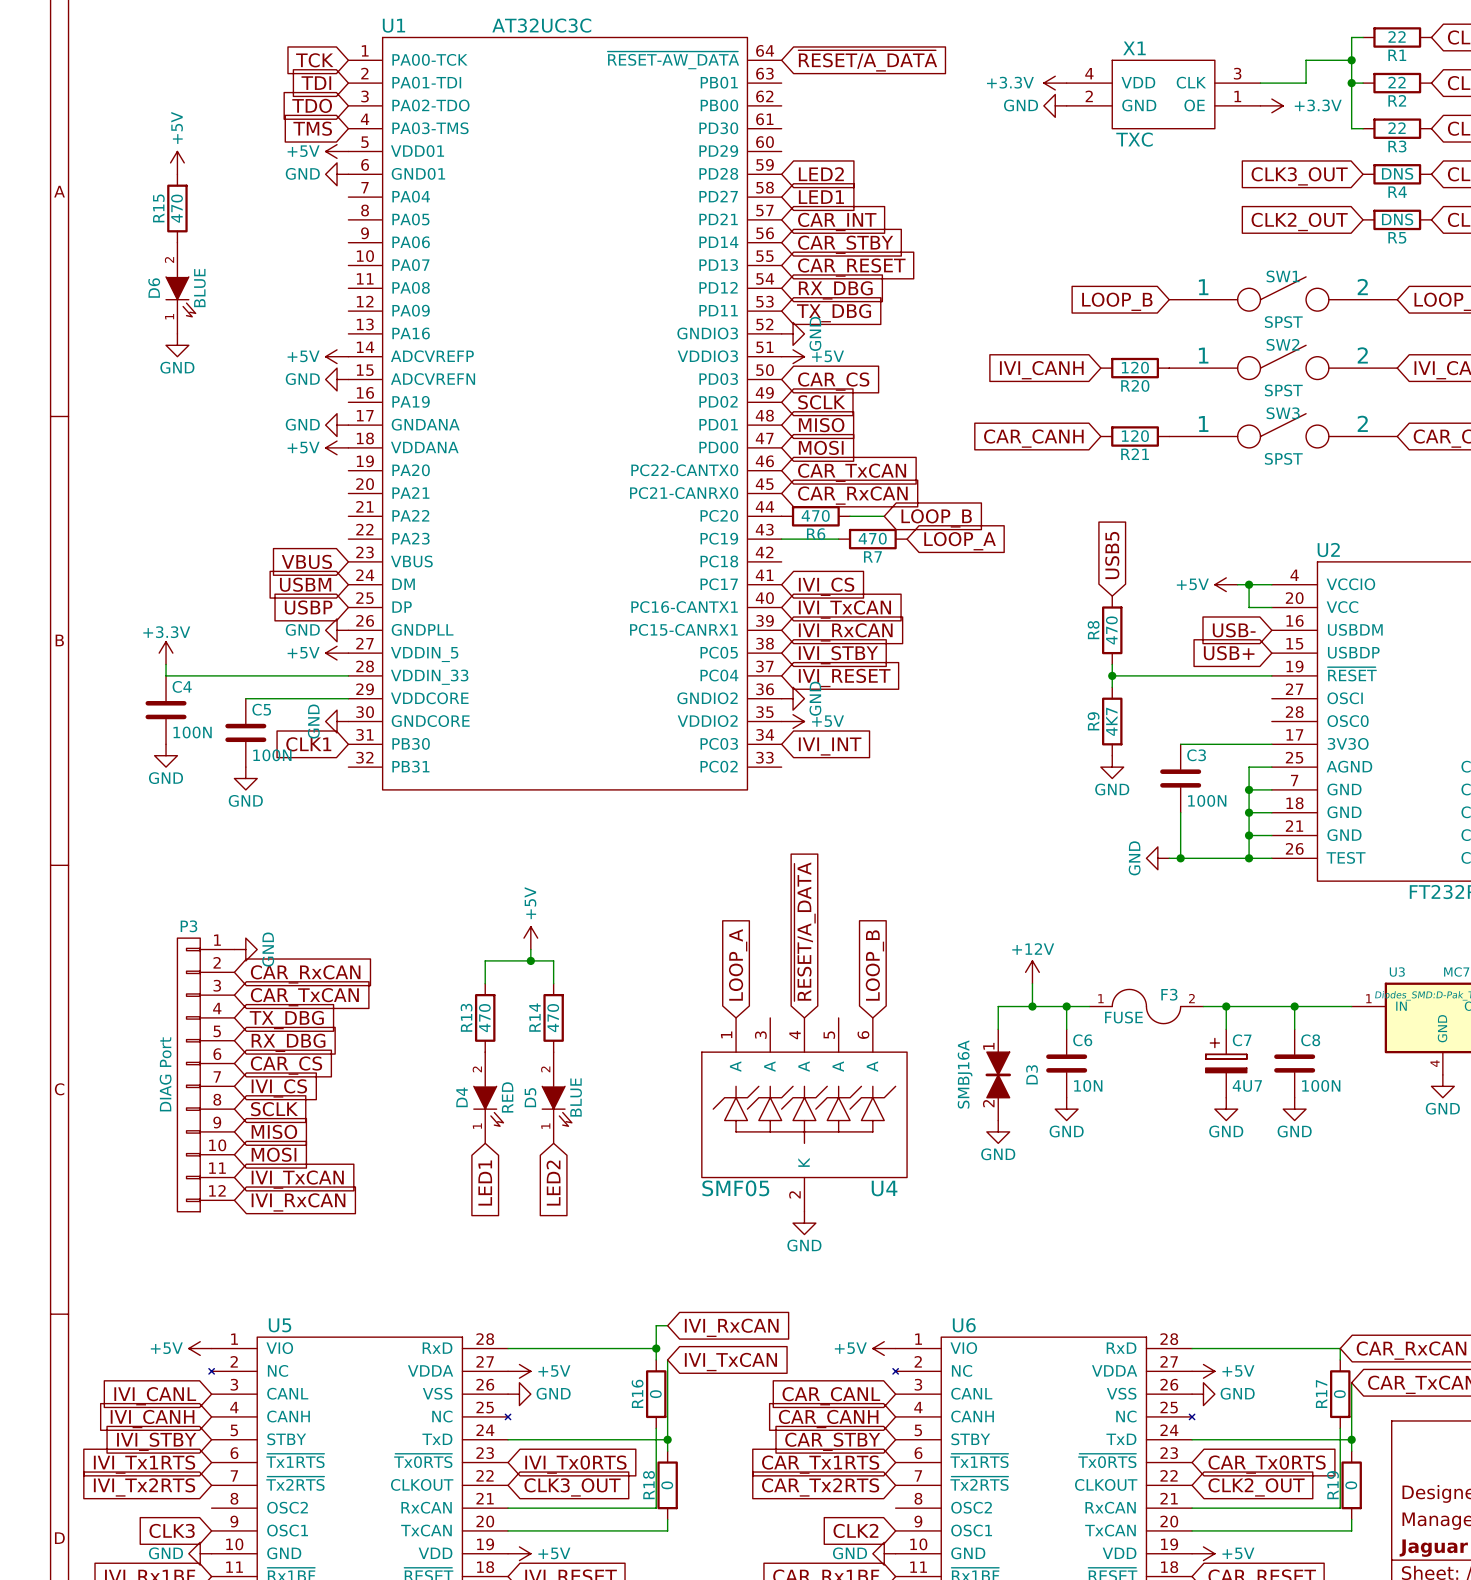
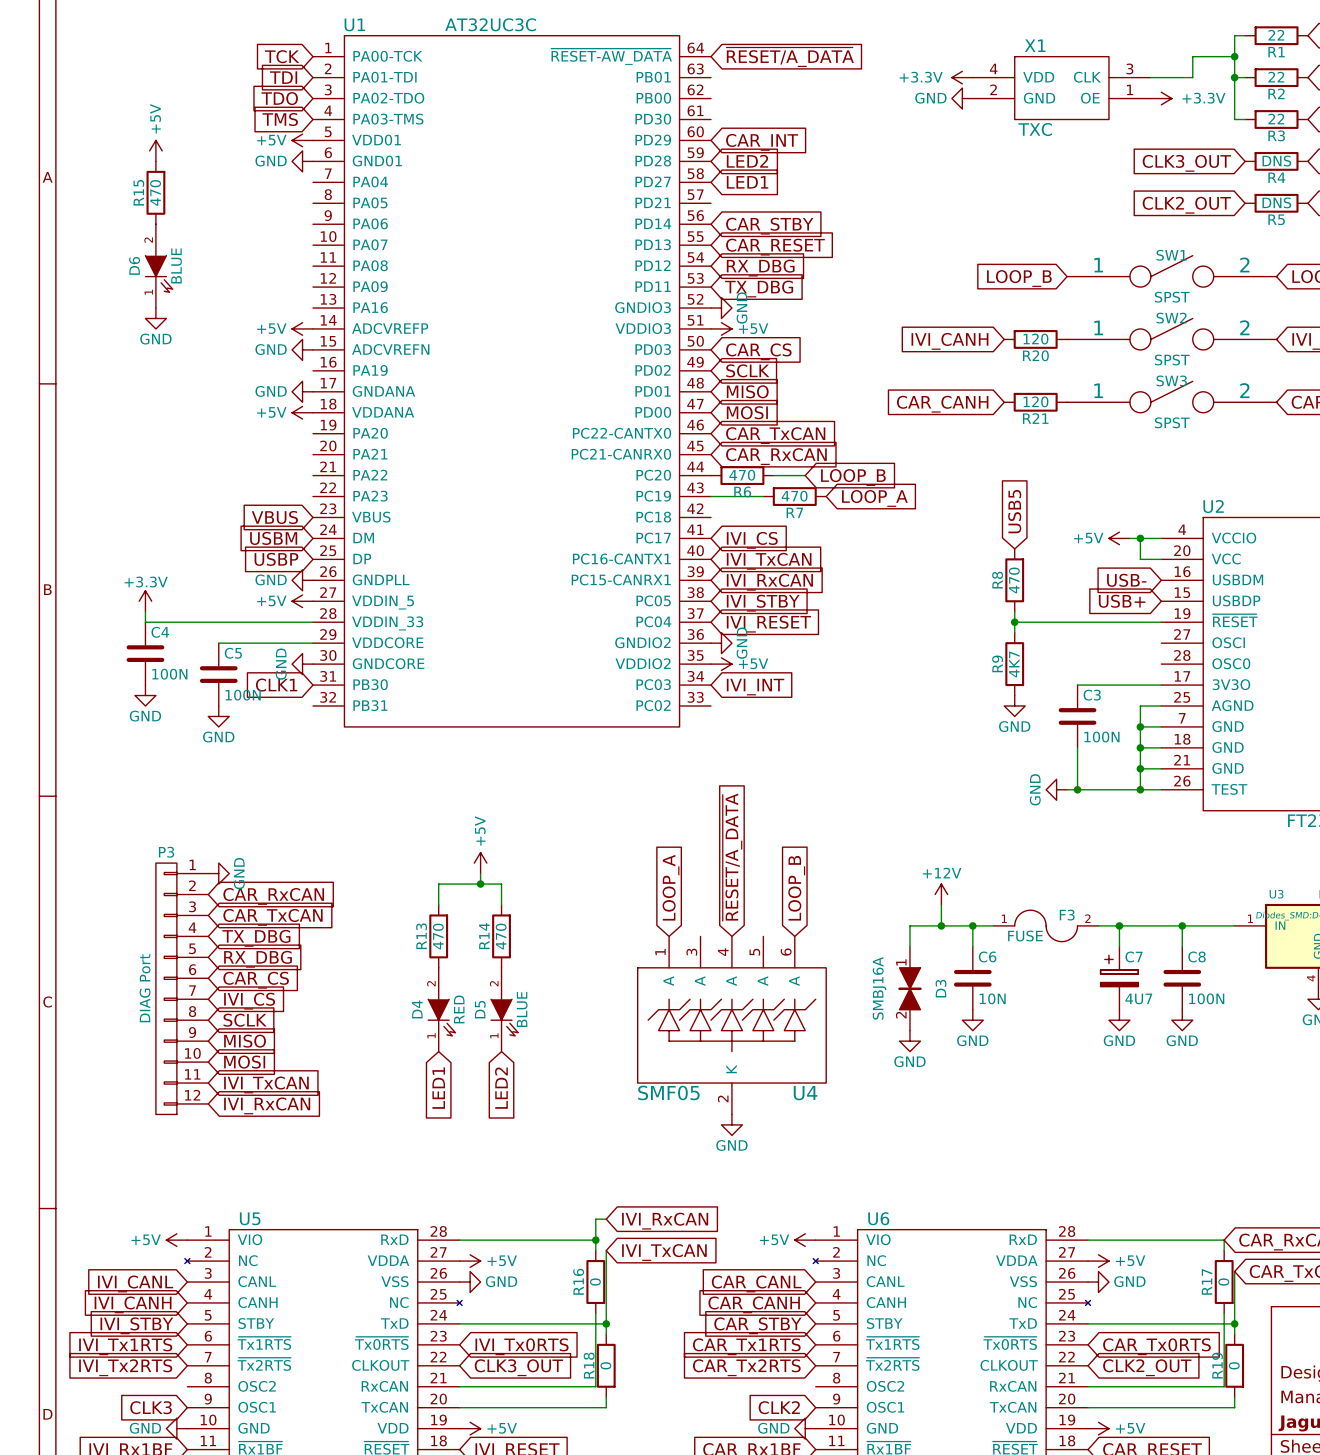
global label position: CAR_INT (837, 221) -> CAR_INT (762, 142)

